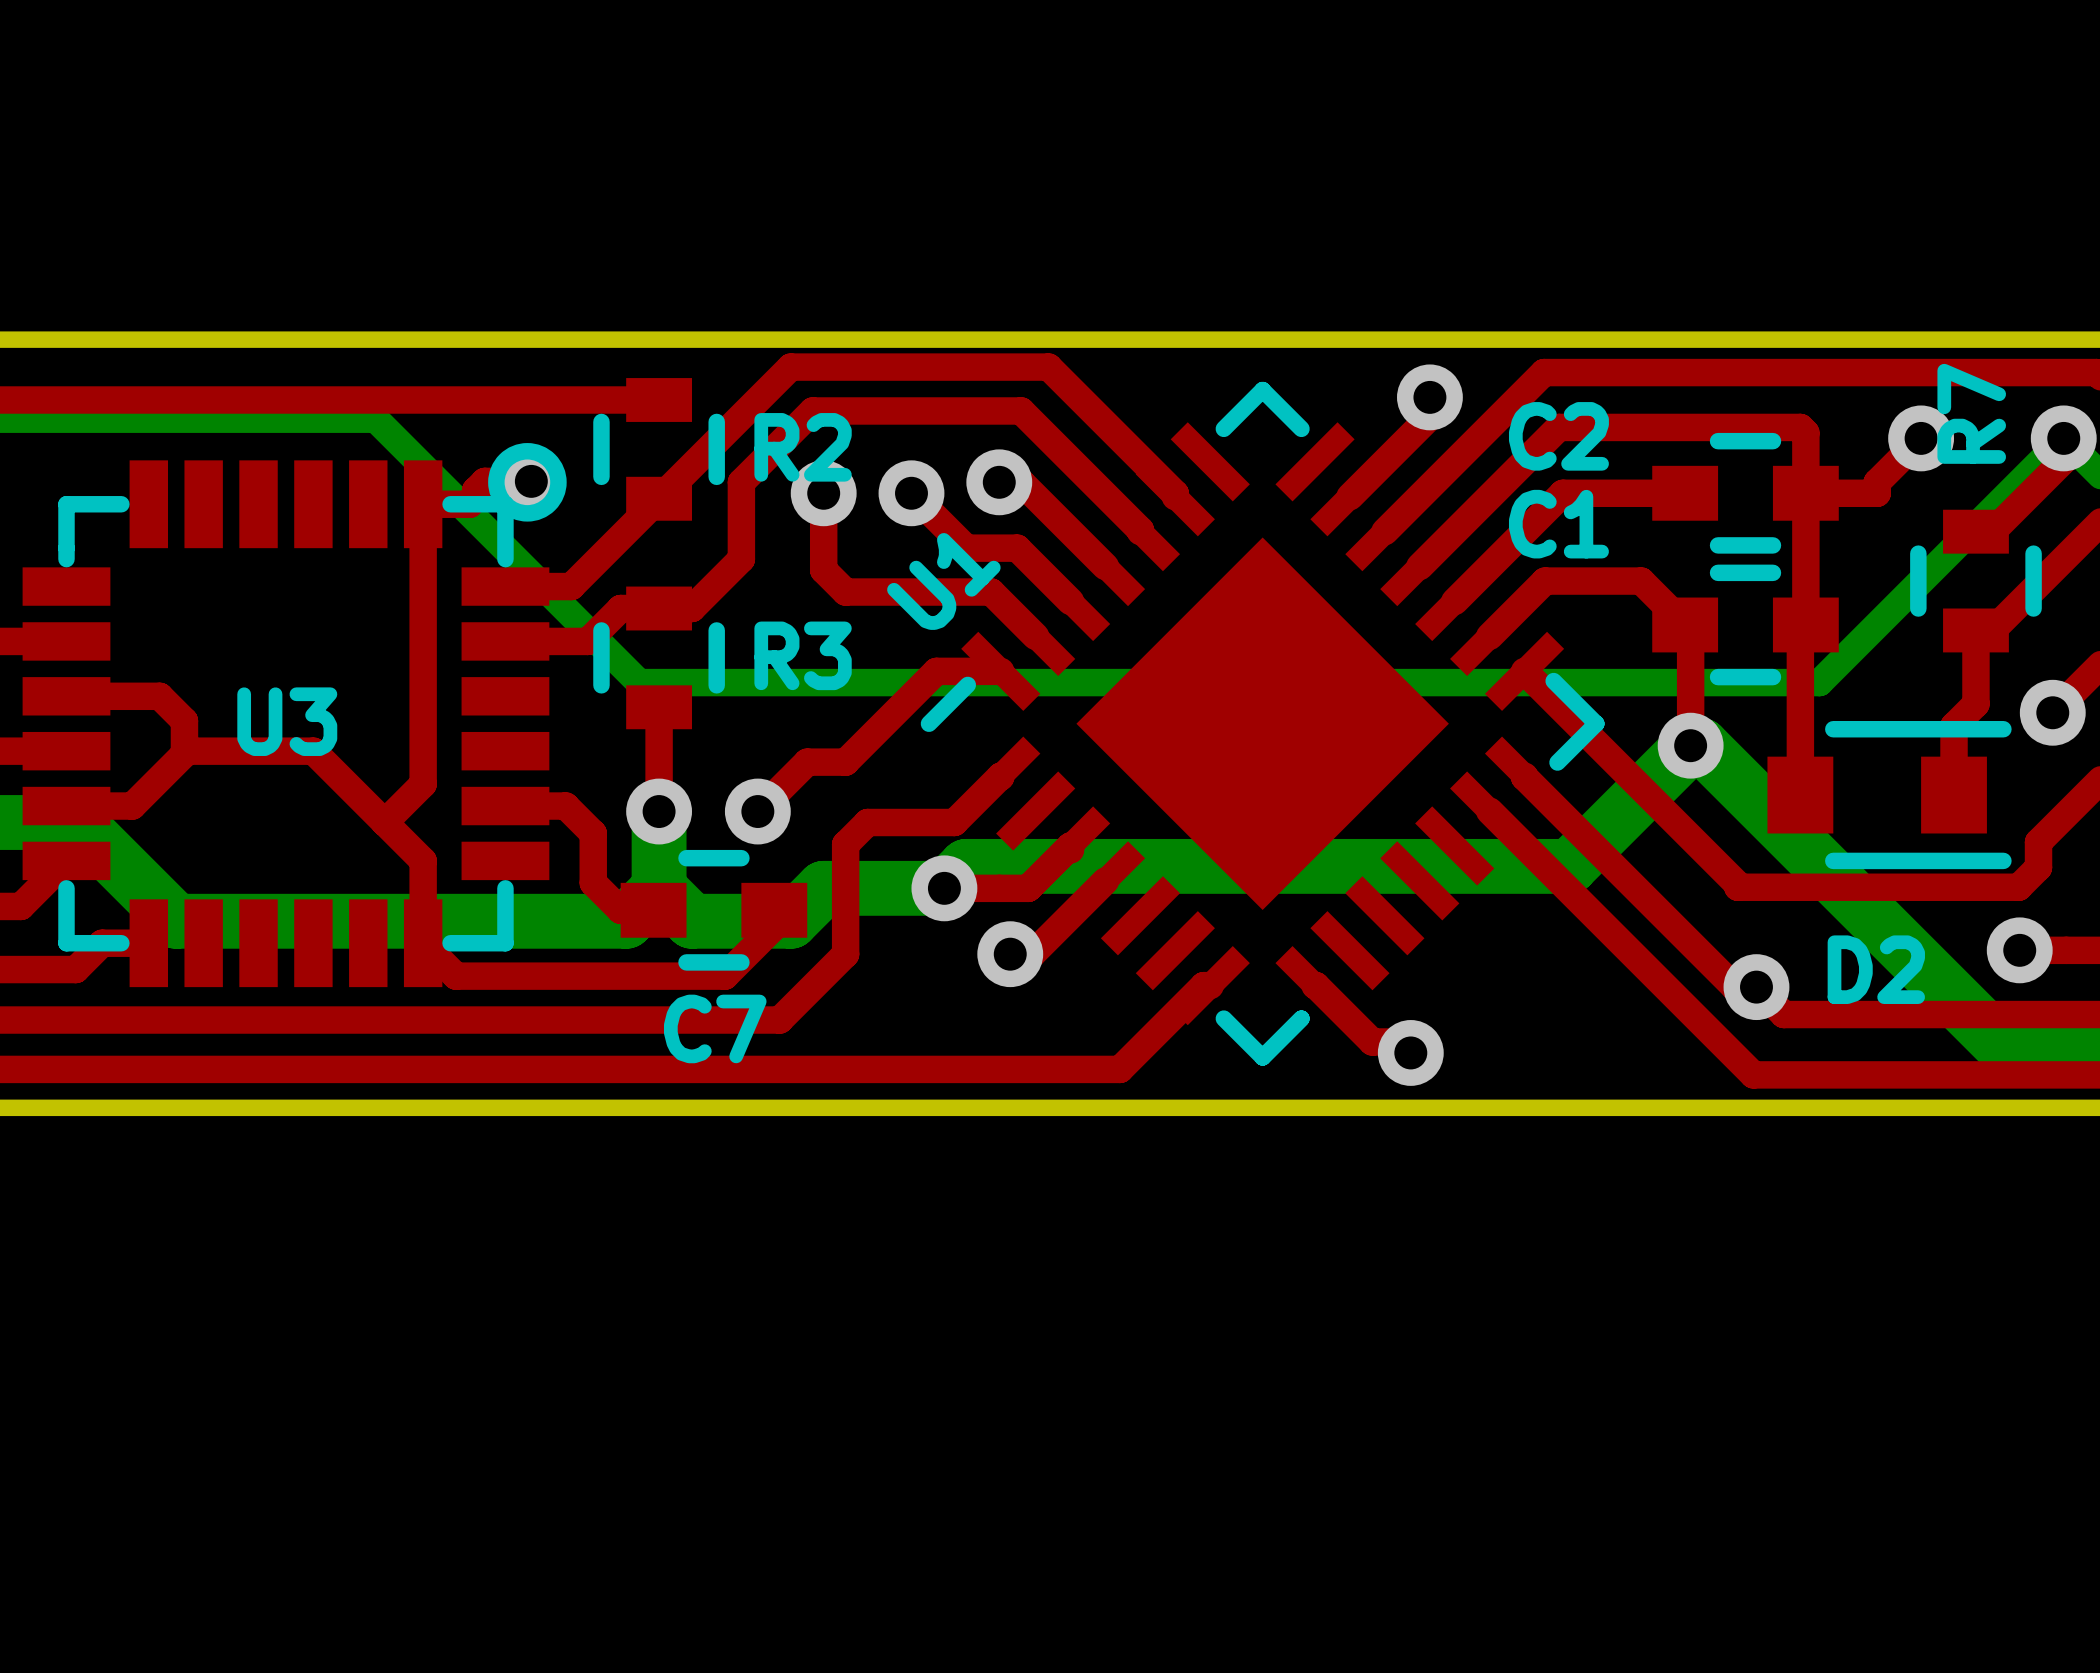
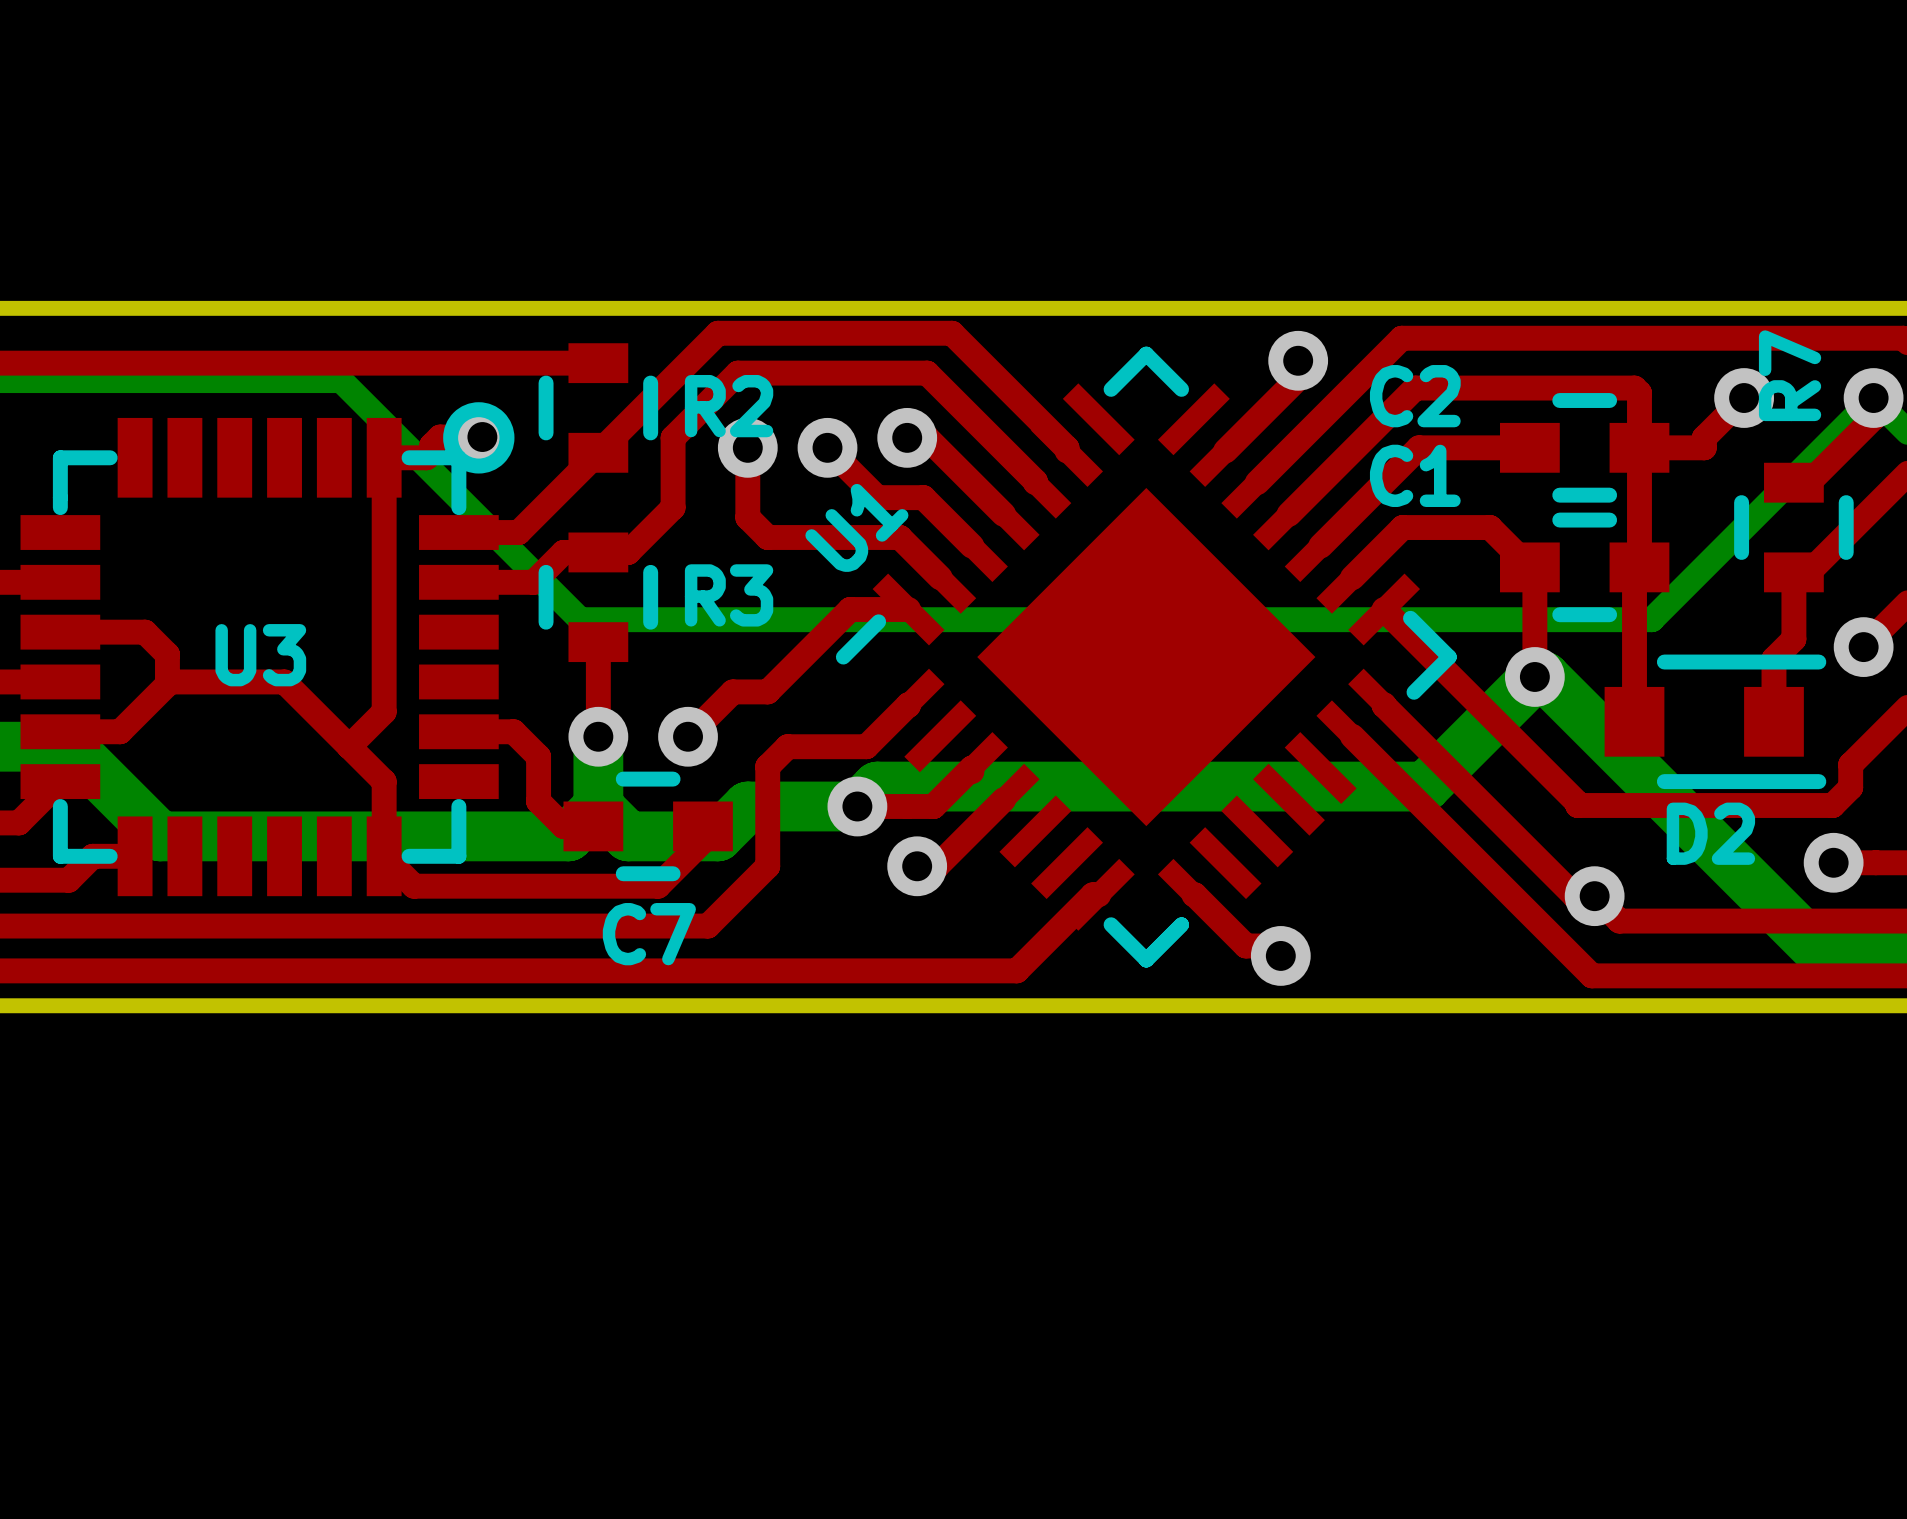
D2 name position: D2 (1876, 969) -> D2 (1710, 833)

